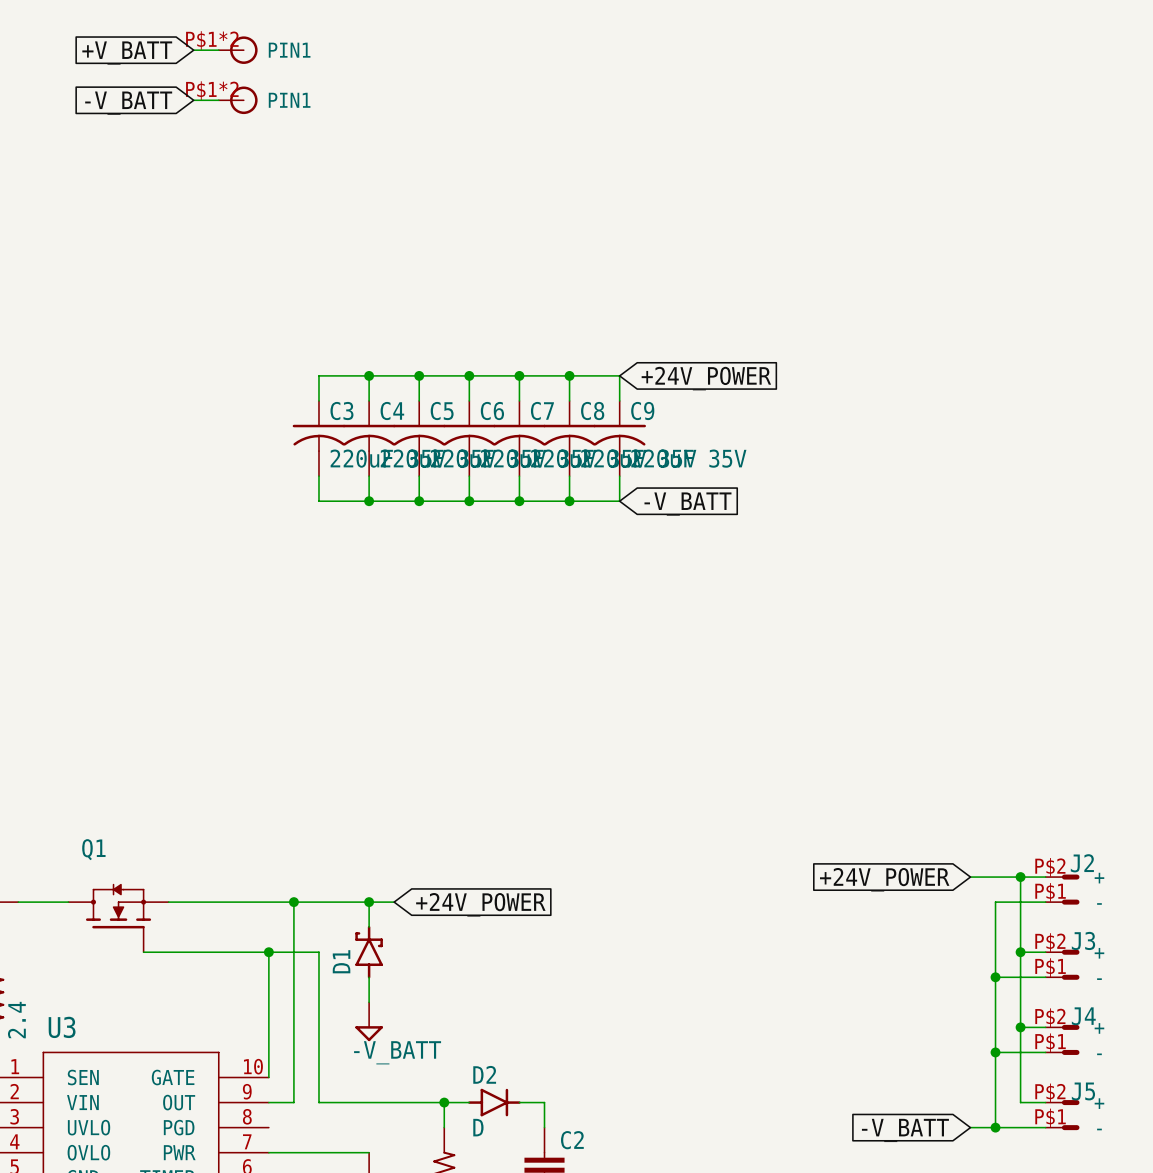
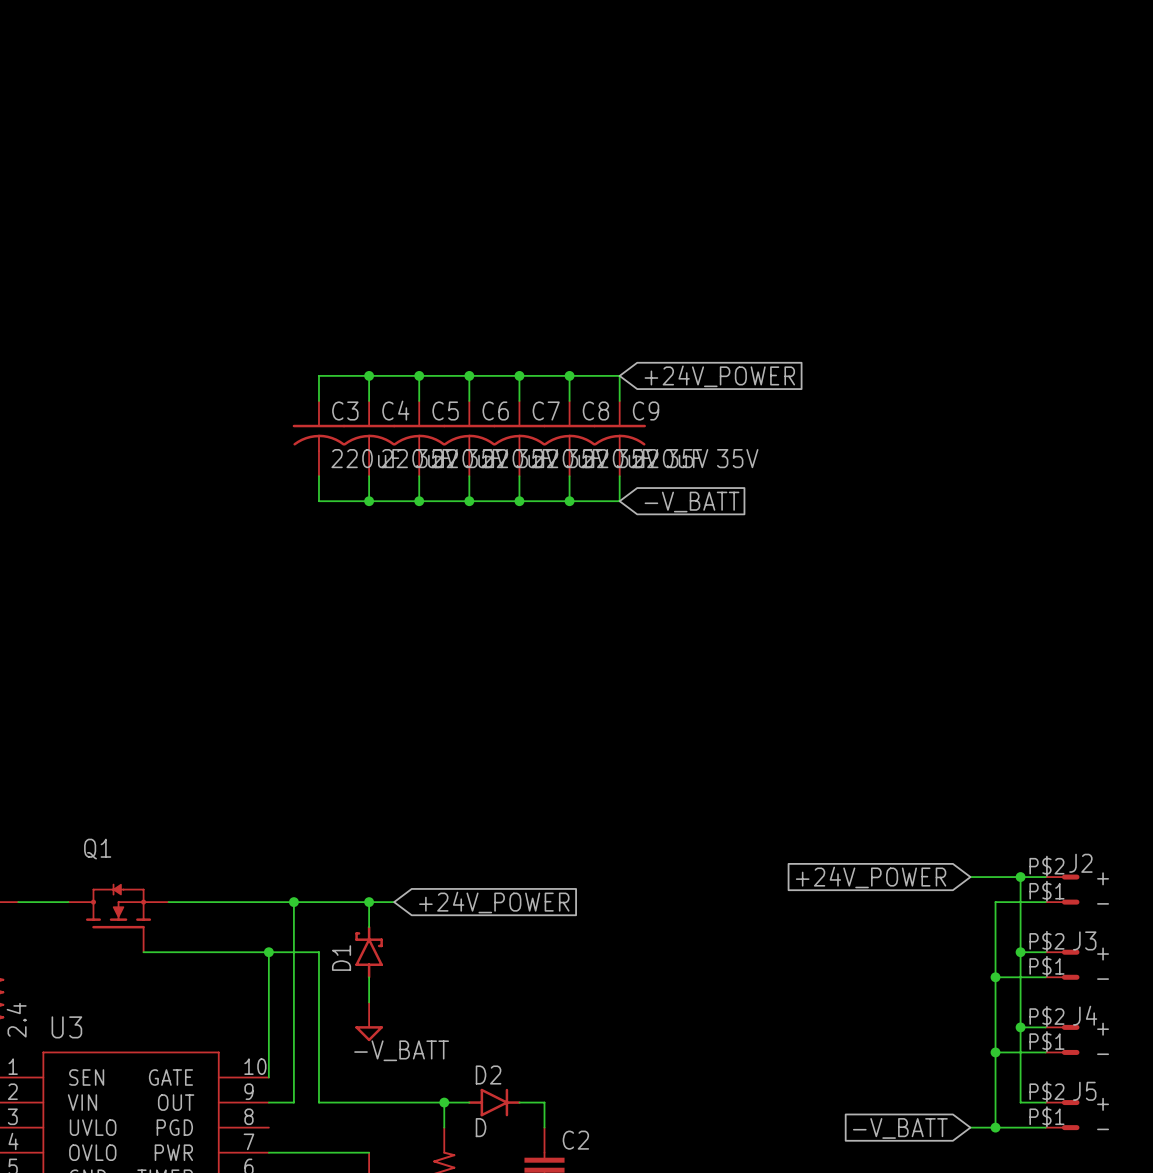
wire: (193, 50) (218, 50) -> none
part: (238, 50) -> none
global label: +V_BATT (127, 53) -> none
wire: (193, 100) (218, 100) -> none
part: (238, 100) -> none
global label: -V_BATT (128, 103) -> none

